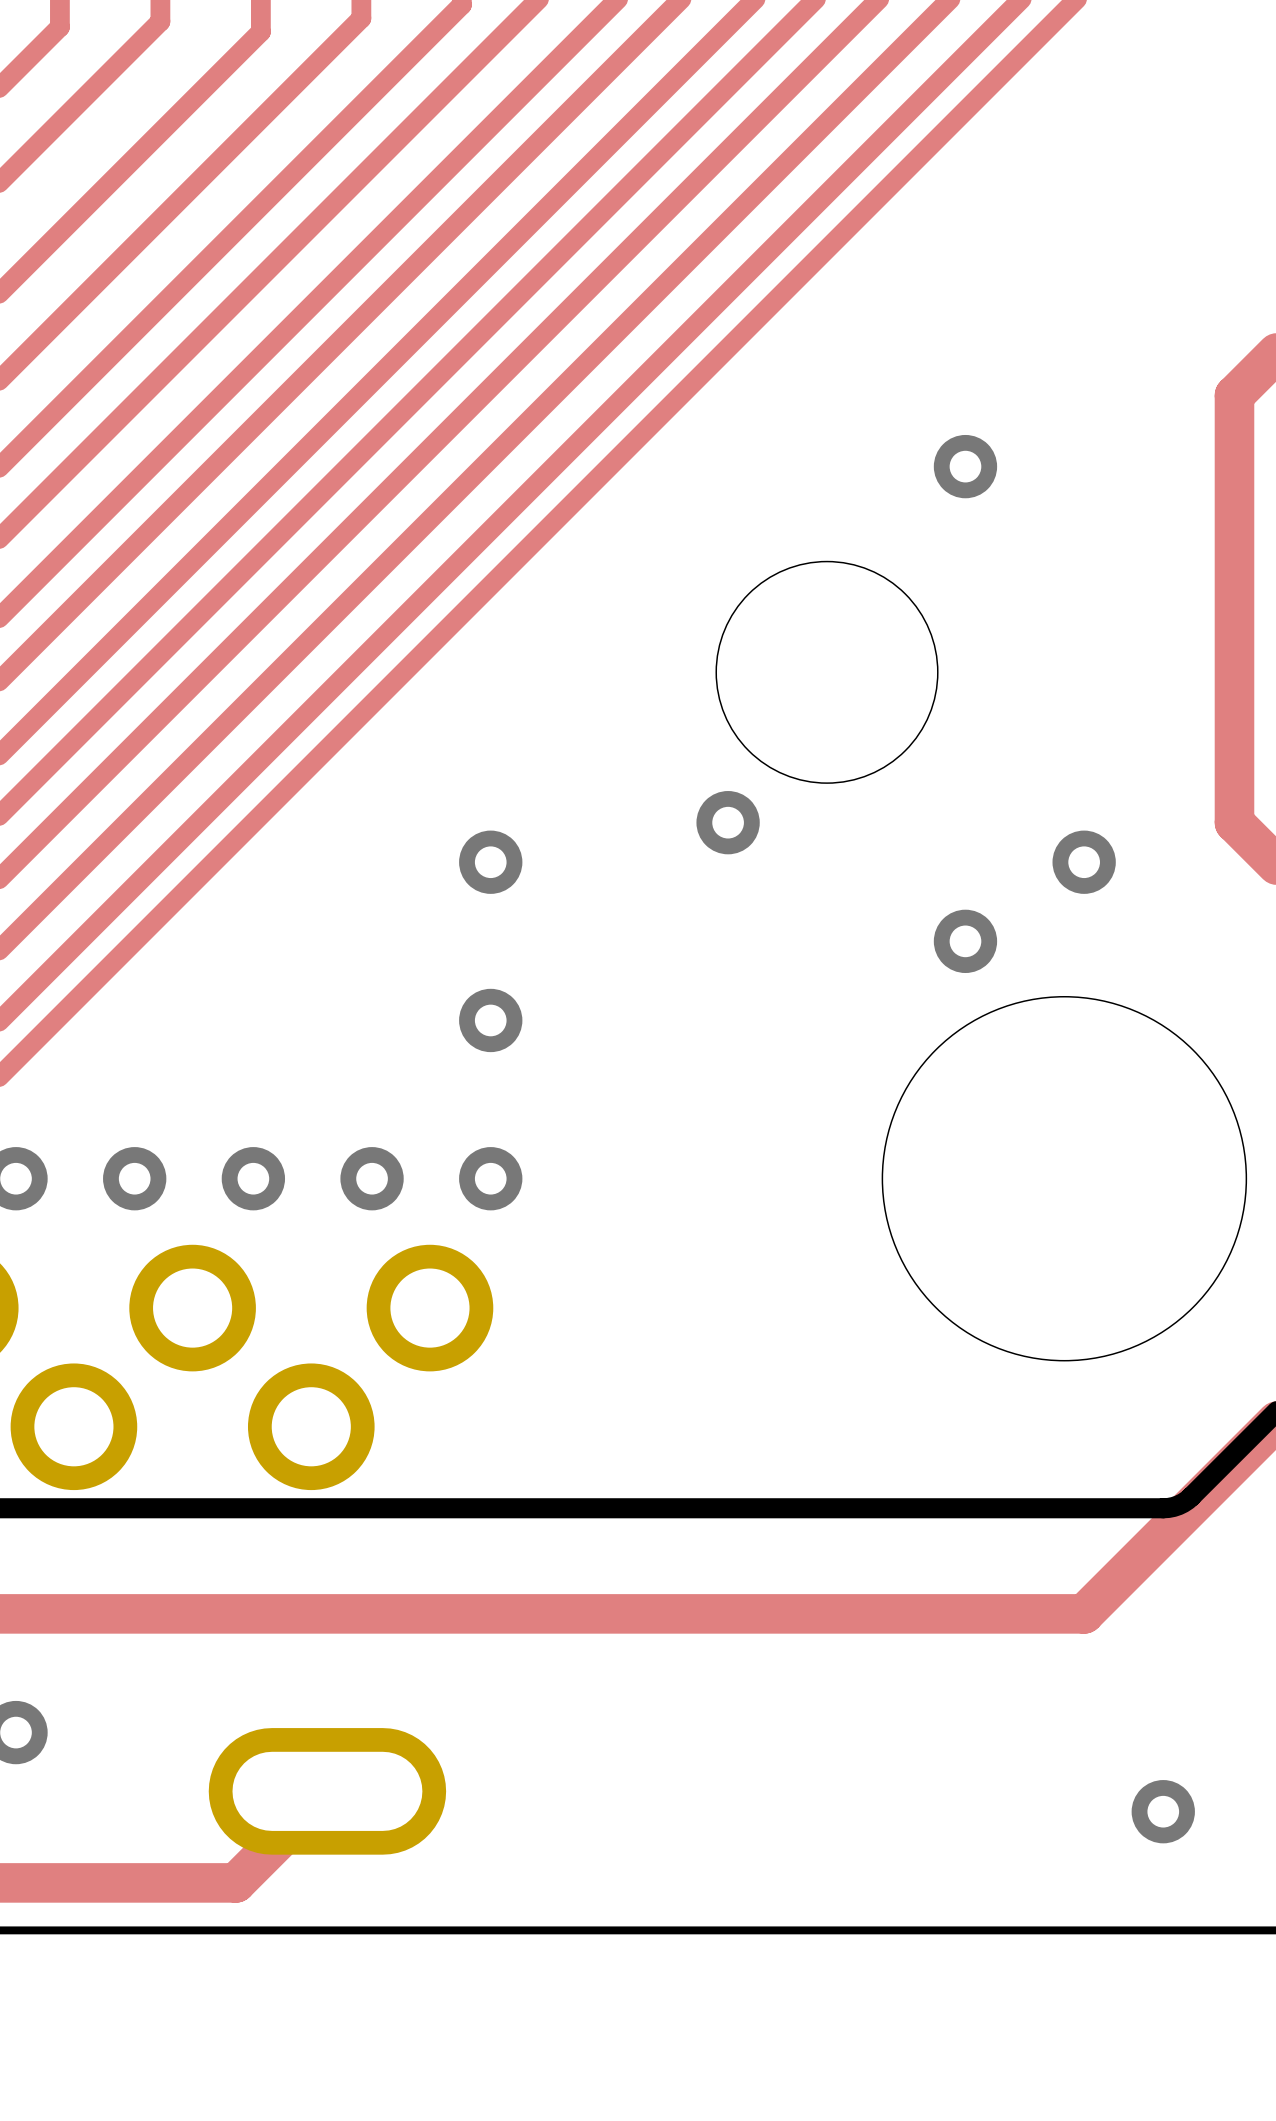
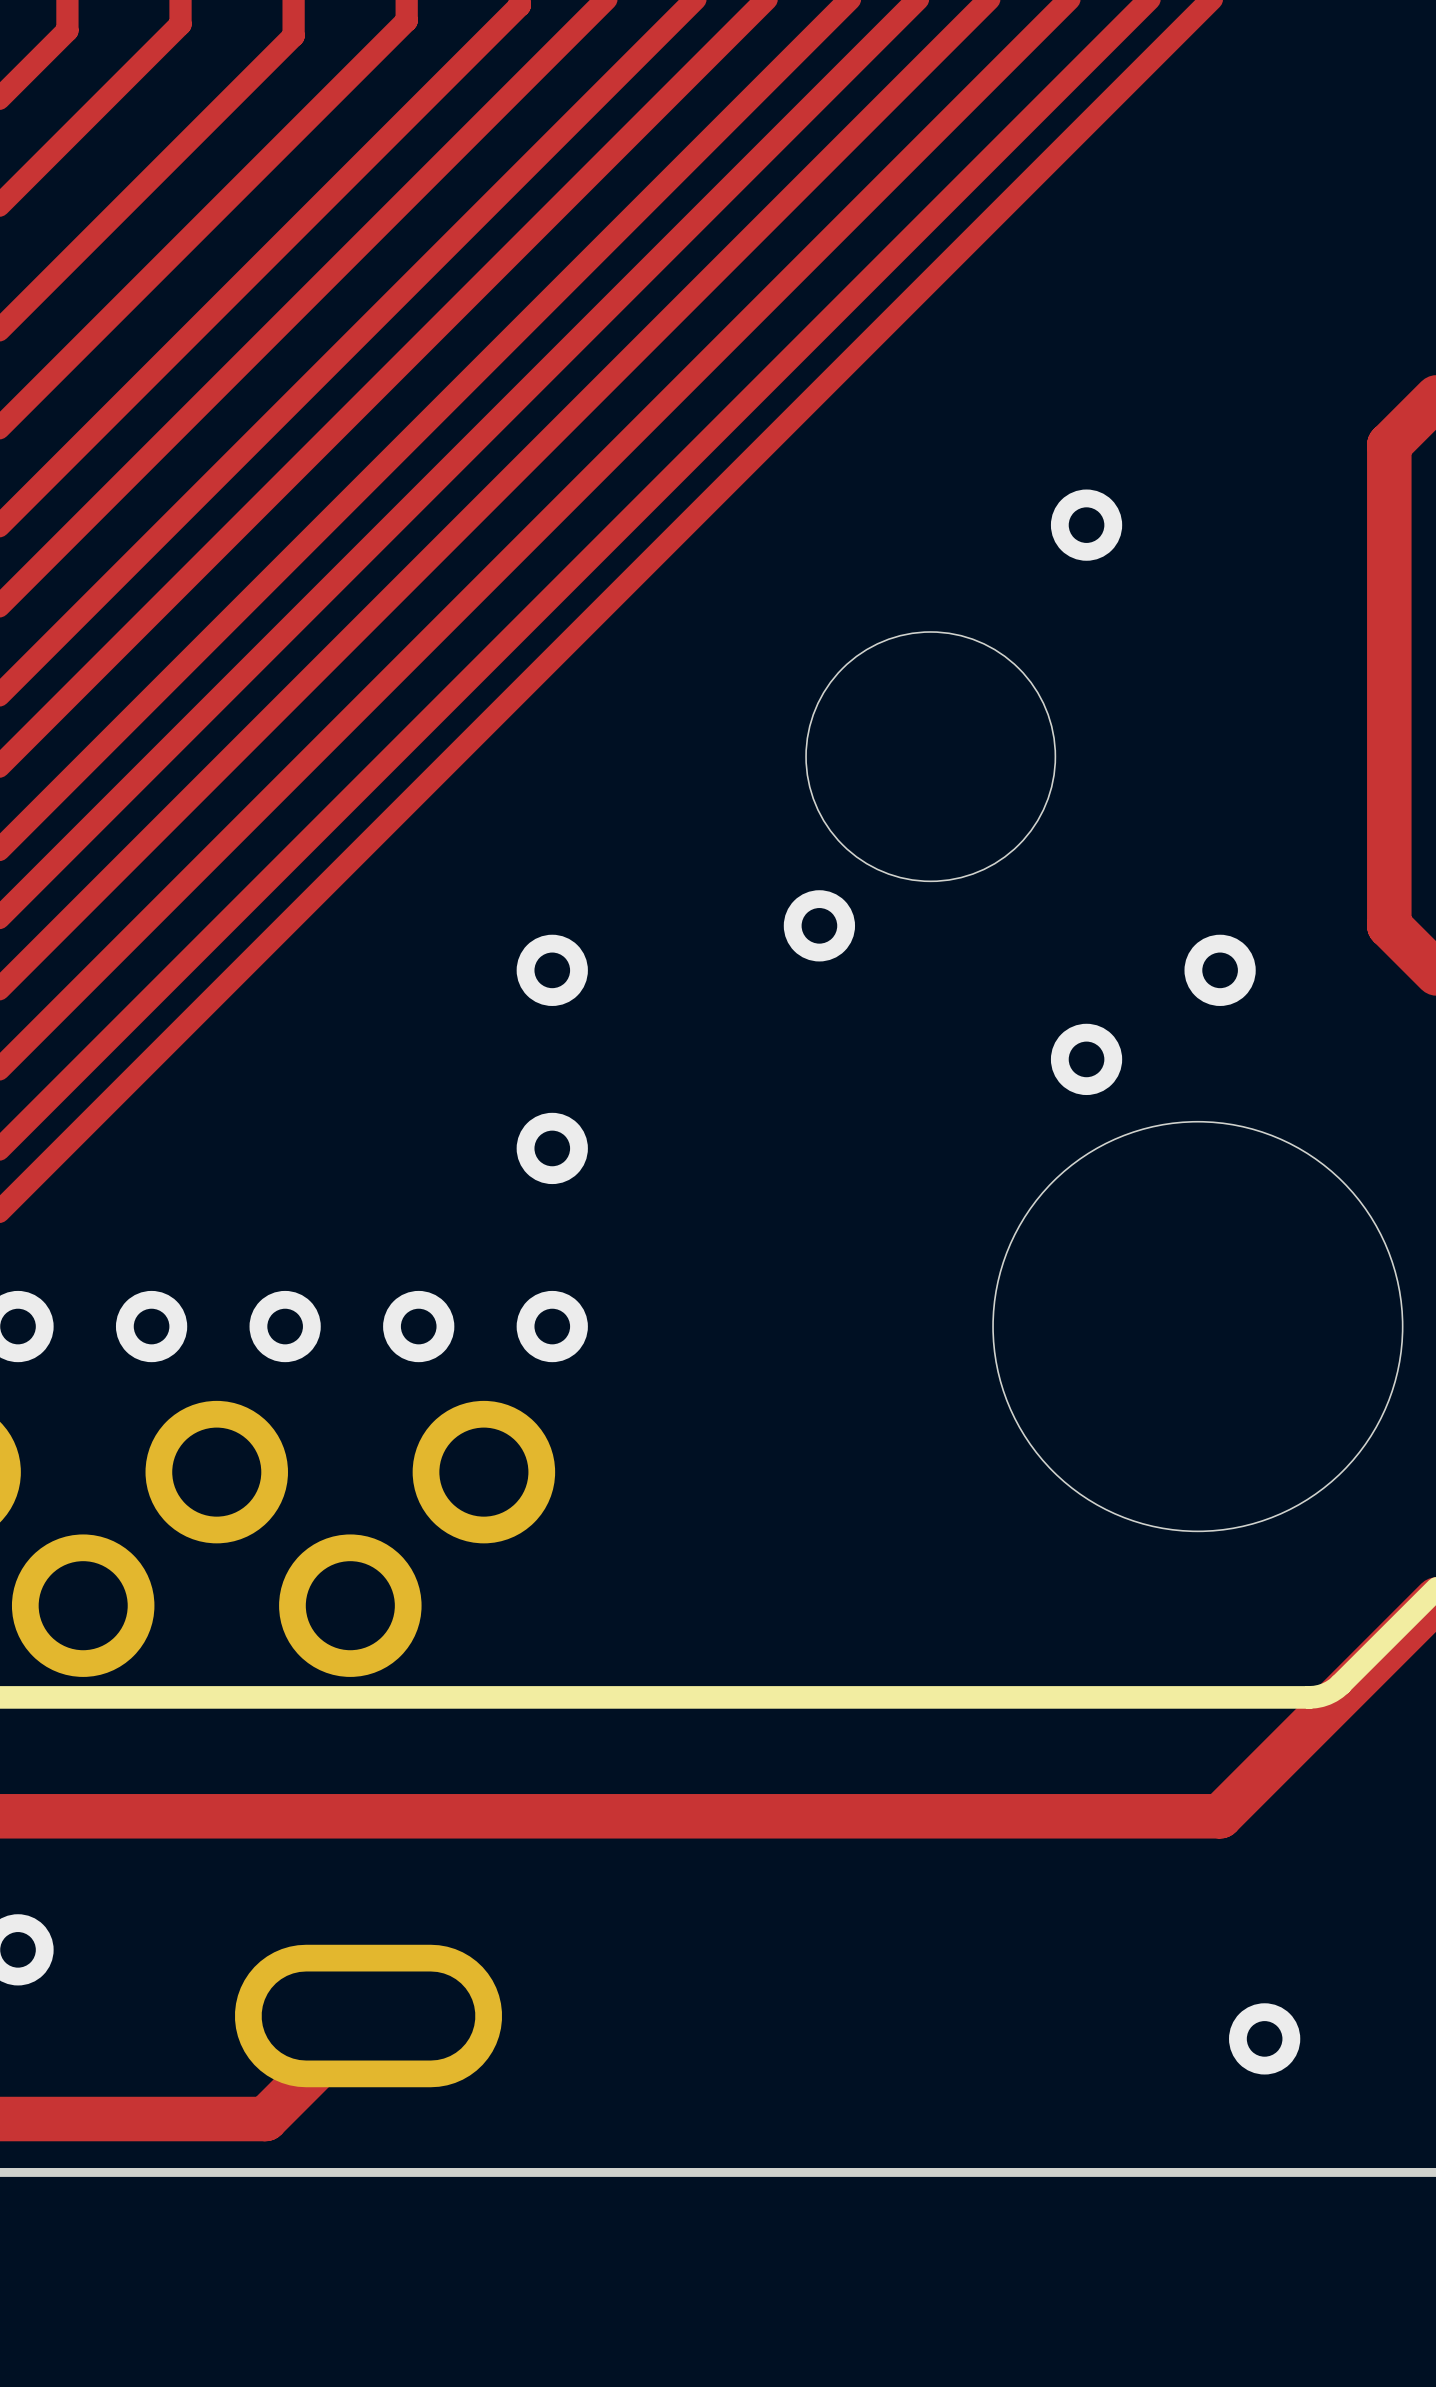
via position: (1163, 1811) -> (1264, 2038)

